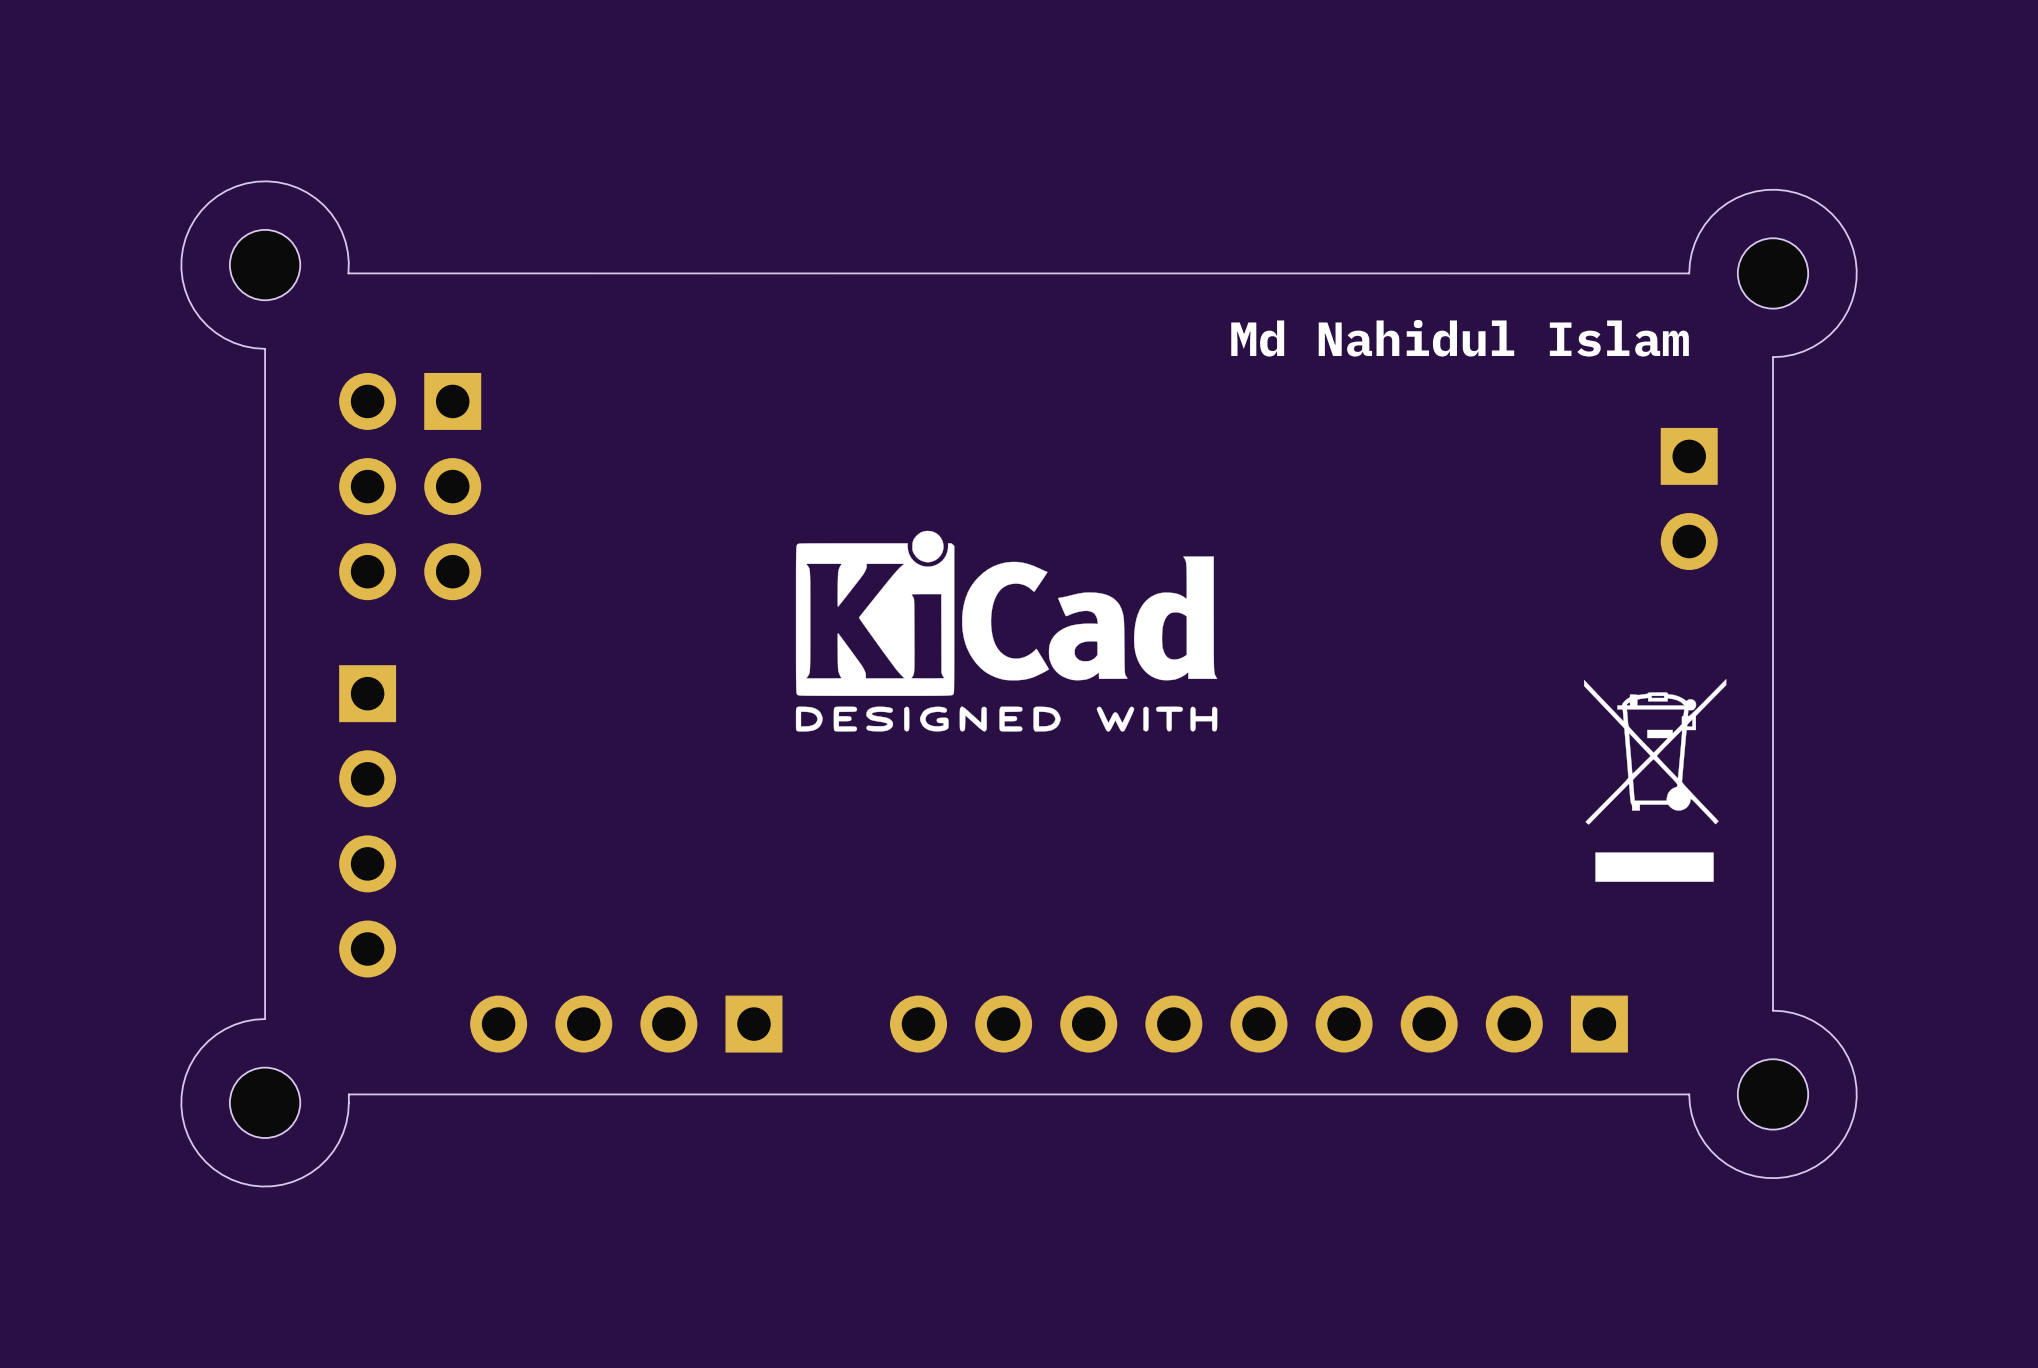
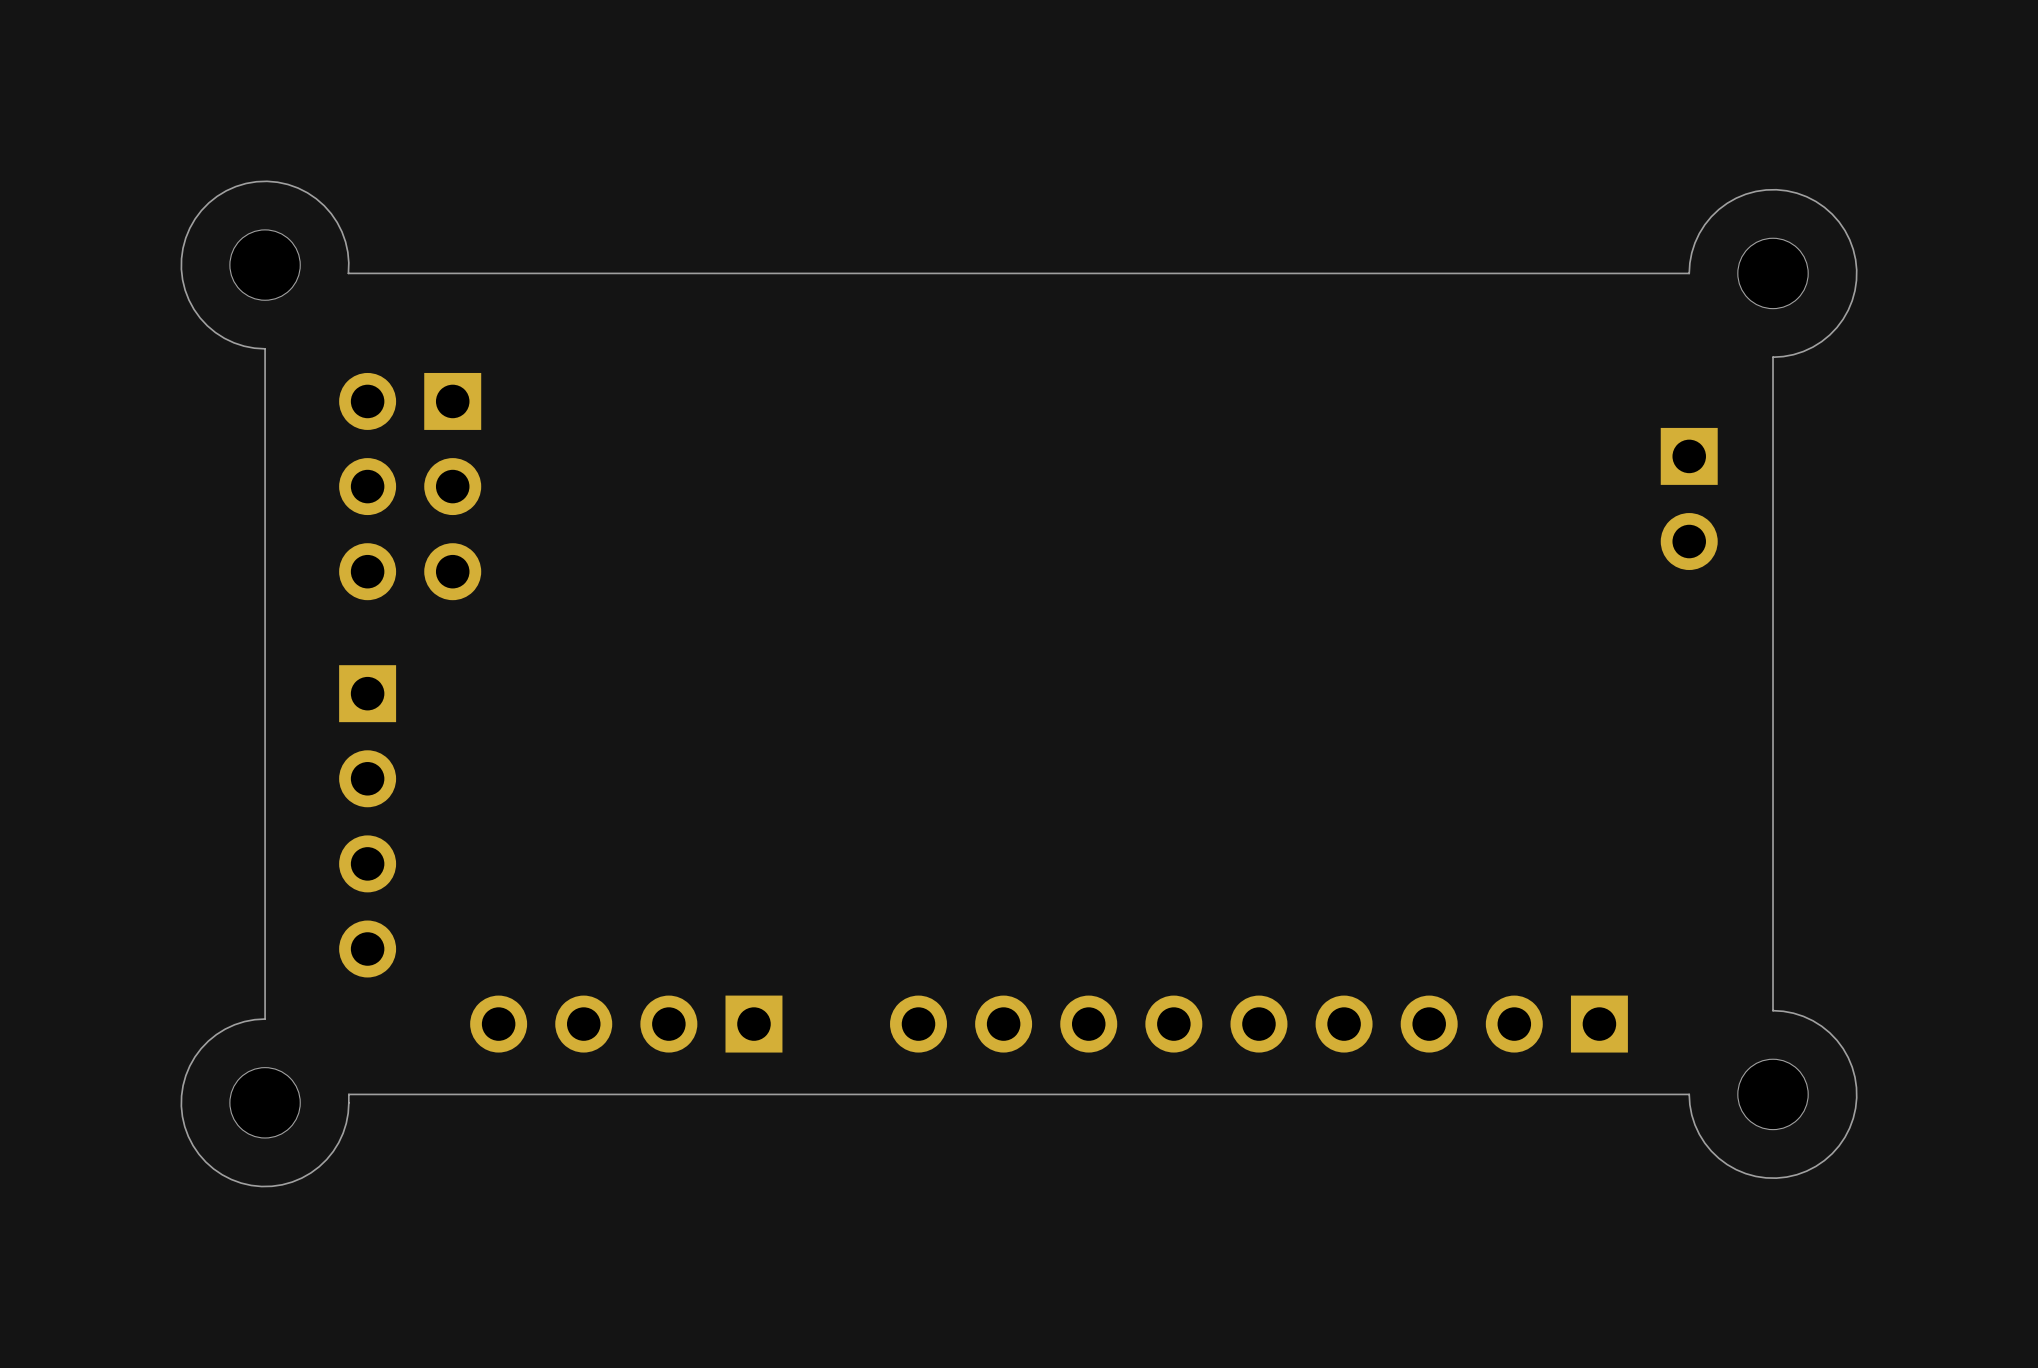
text: Md Nahidul Islam (1460, 338) -> none
drawing: [795, 530, 1218, 732] -> none
drawing: [1584, 679, 1727, 882] -> none

